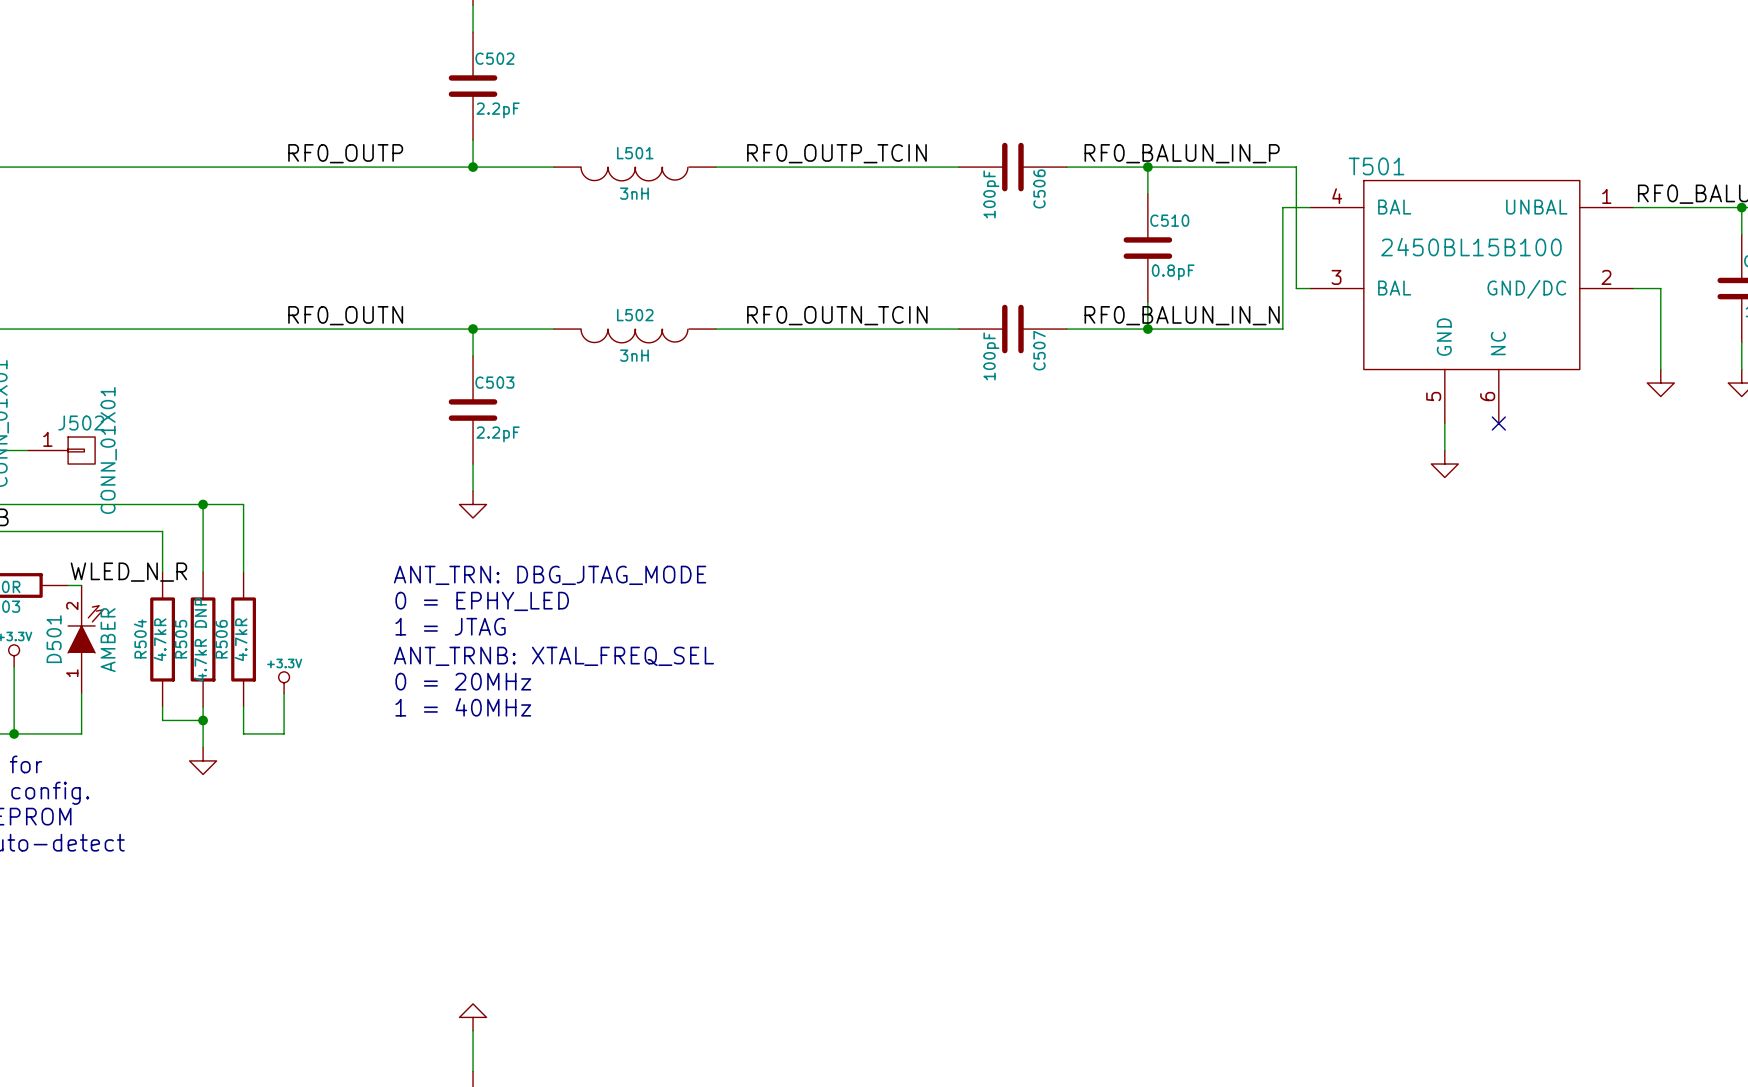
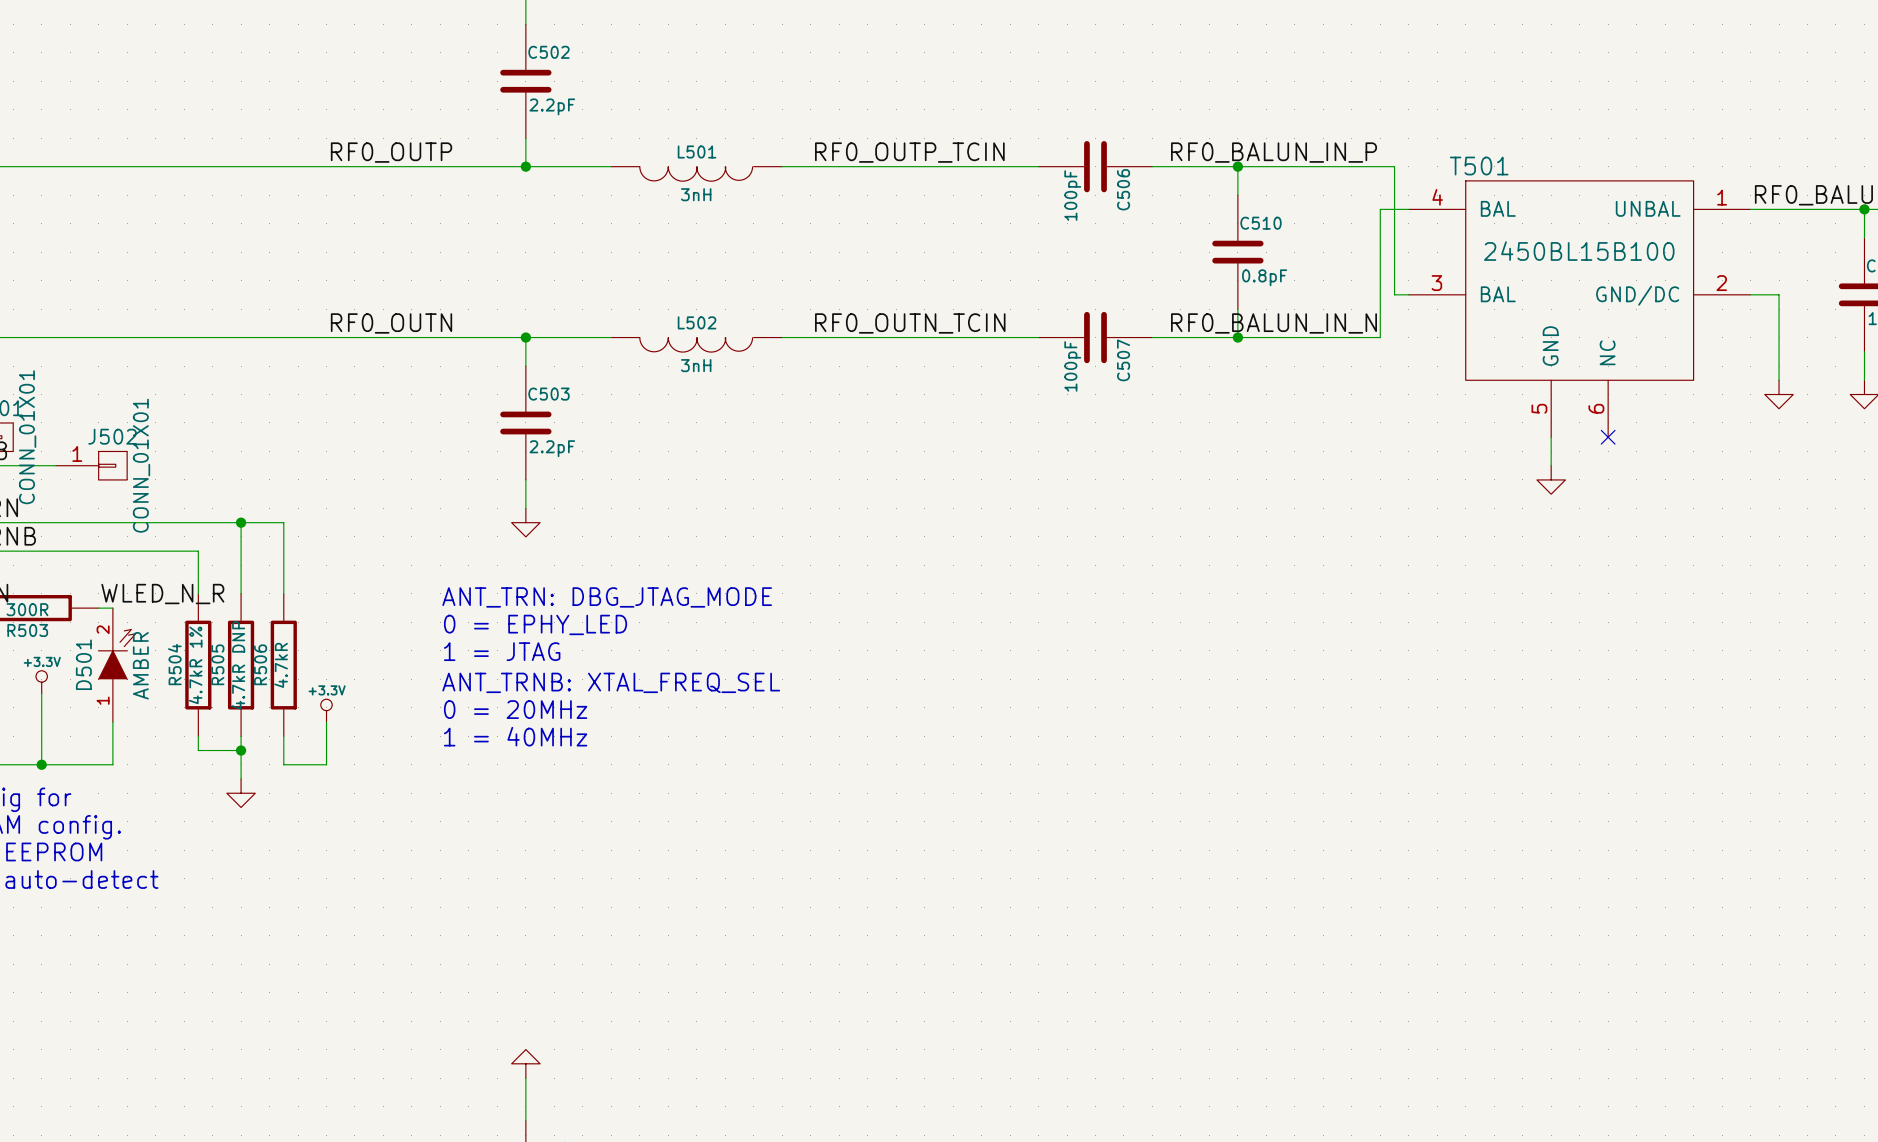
R504 value: 4.7kR (160, 639) -> 4.7kR 1% (195, 665)

